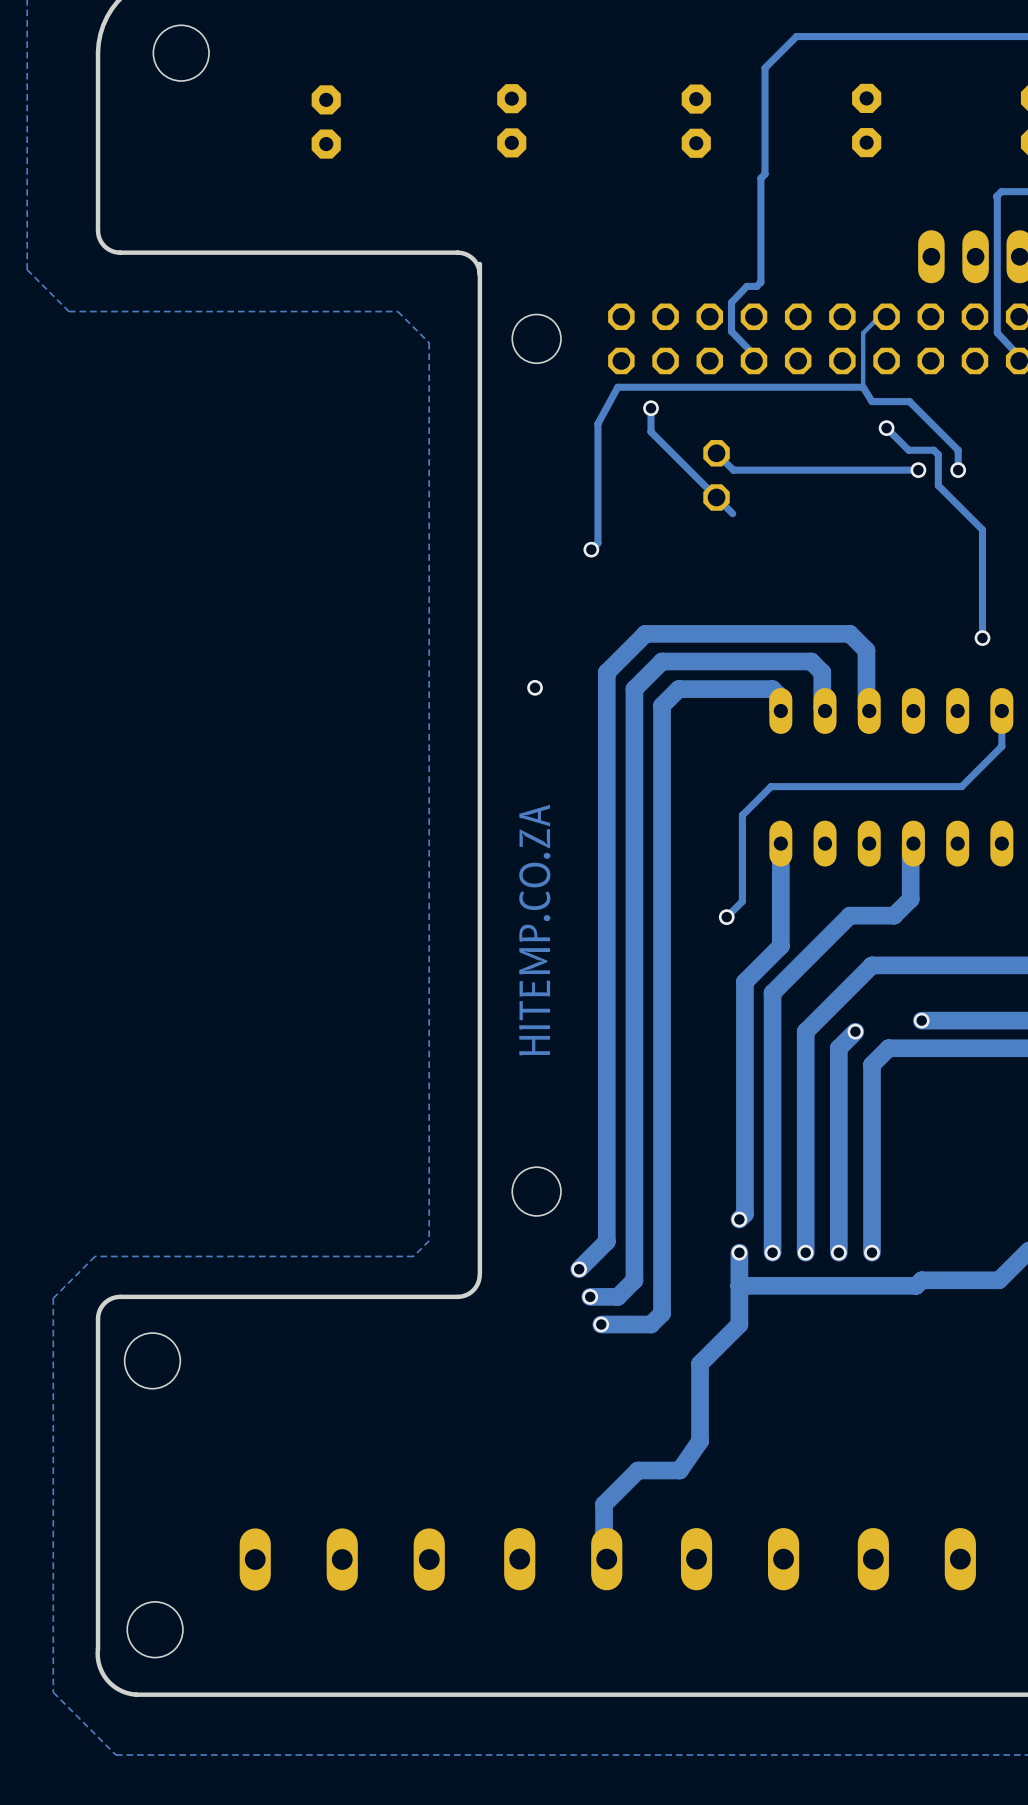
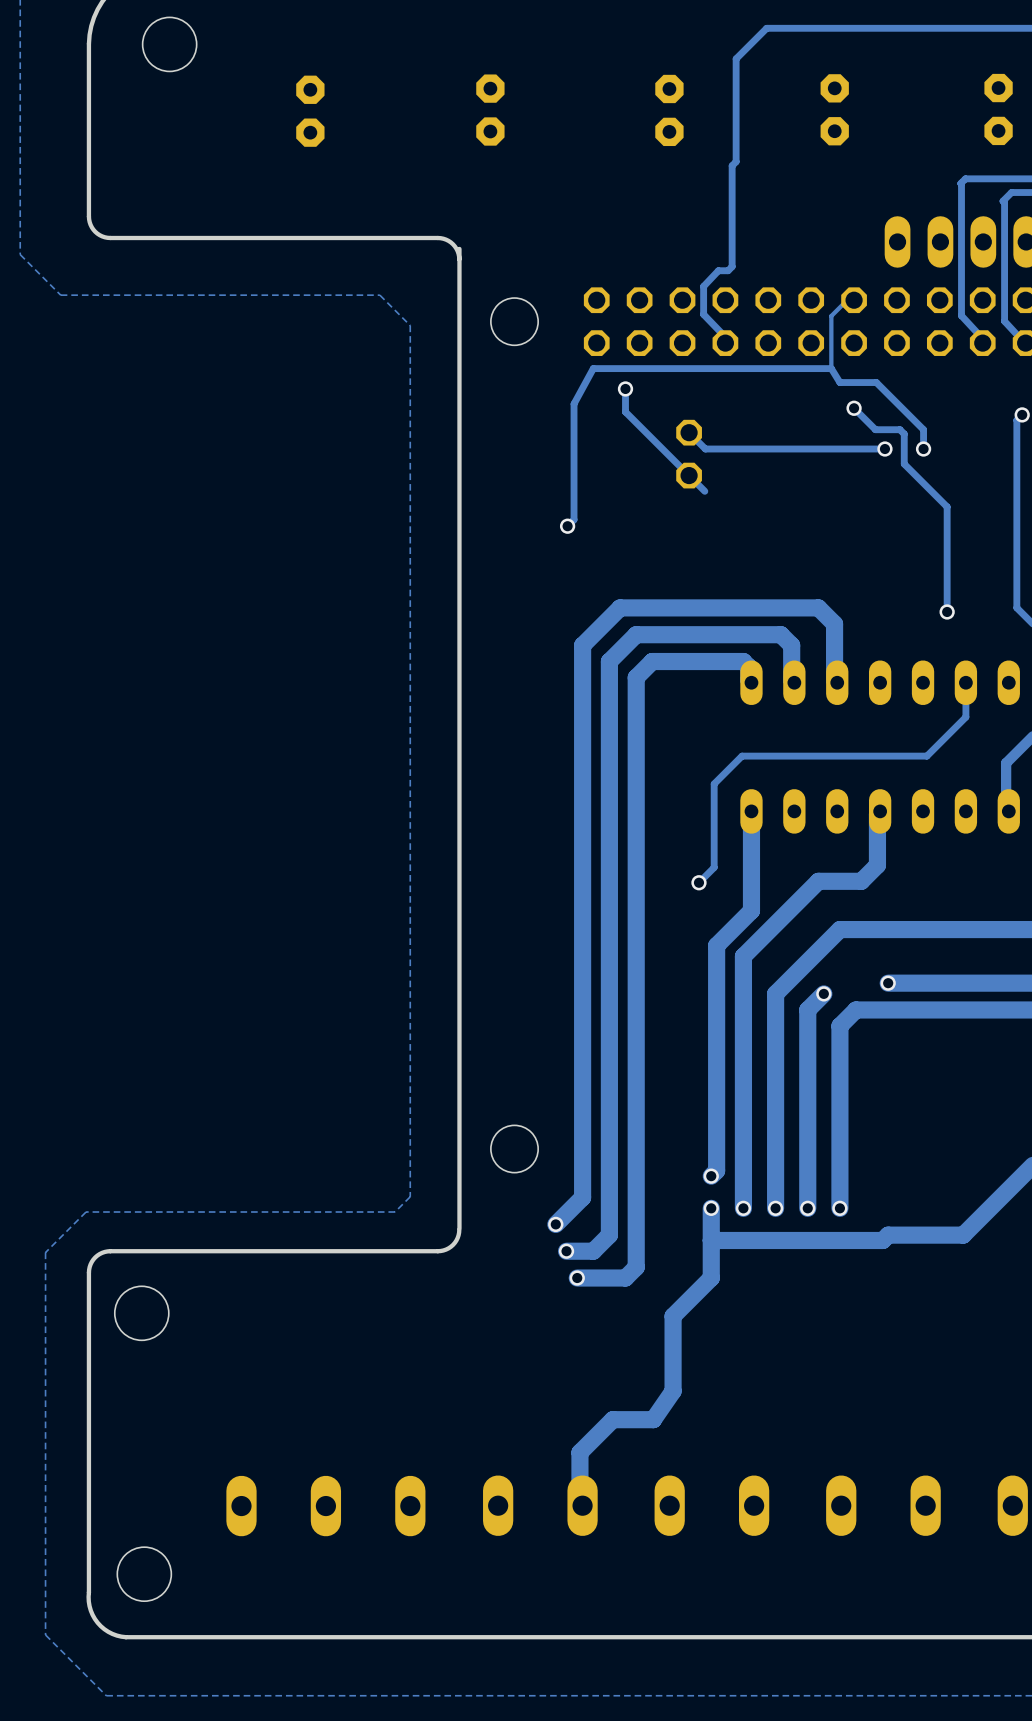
via: (535, 687) -> none
text: HITEMP.CO.ZA (534, 930) -> none

